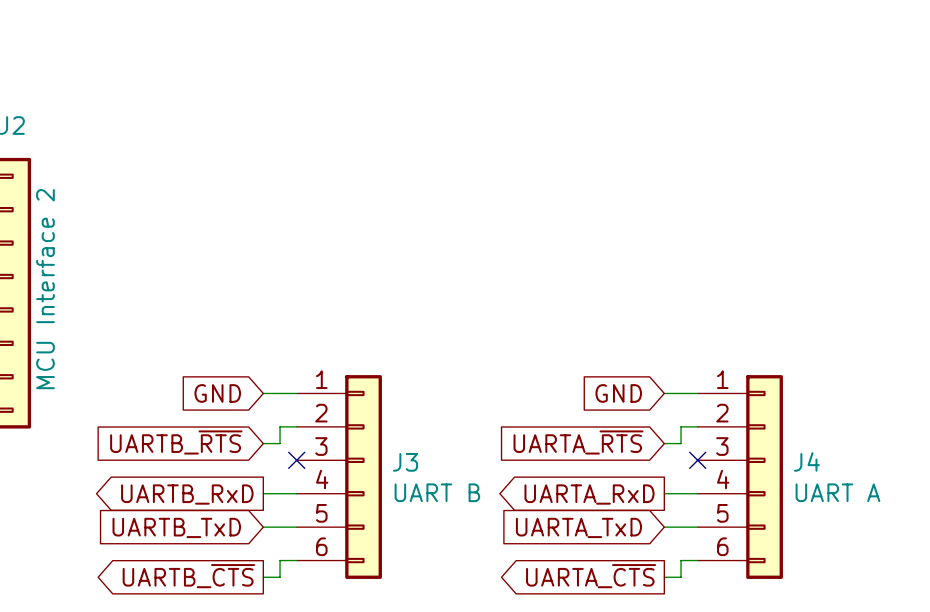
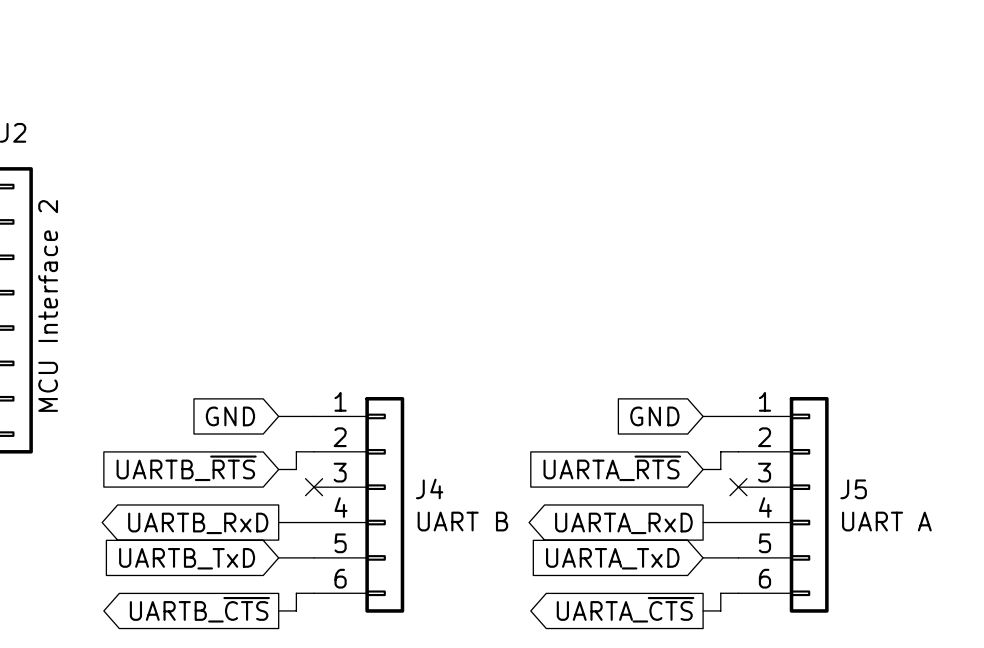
J4 name: J4 (806, 461) -> J5 (853, 489)
J3 name: J3 (405, 462) -> J4 (429, 488)

